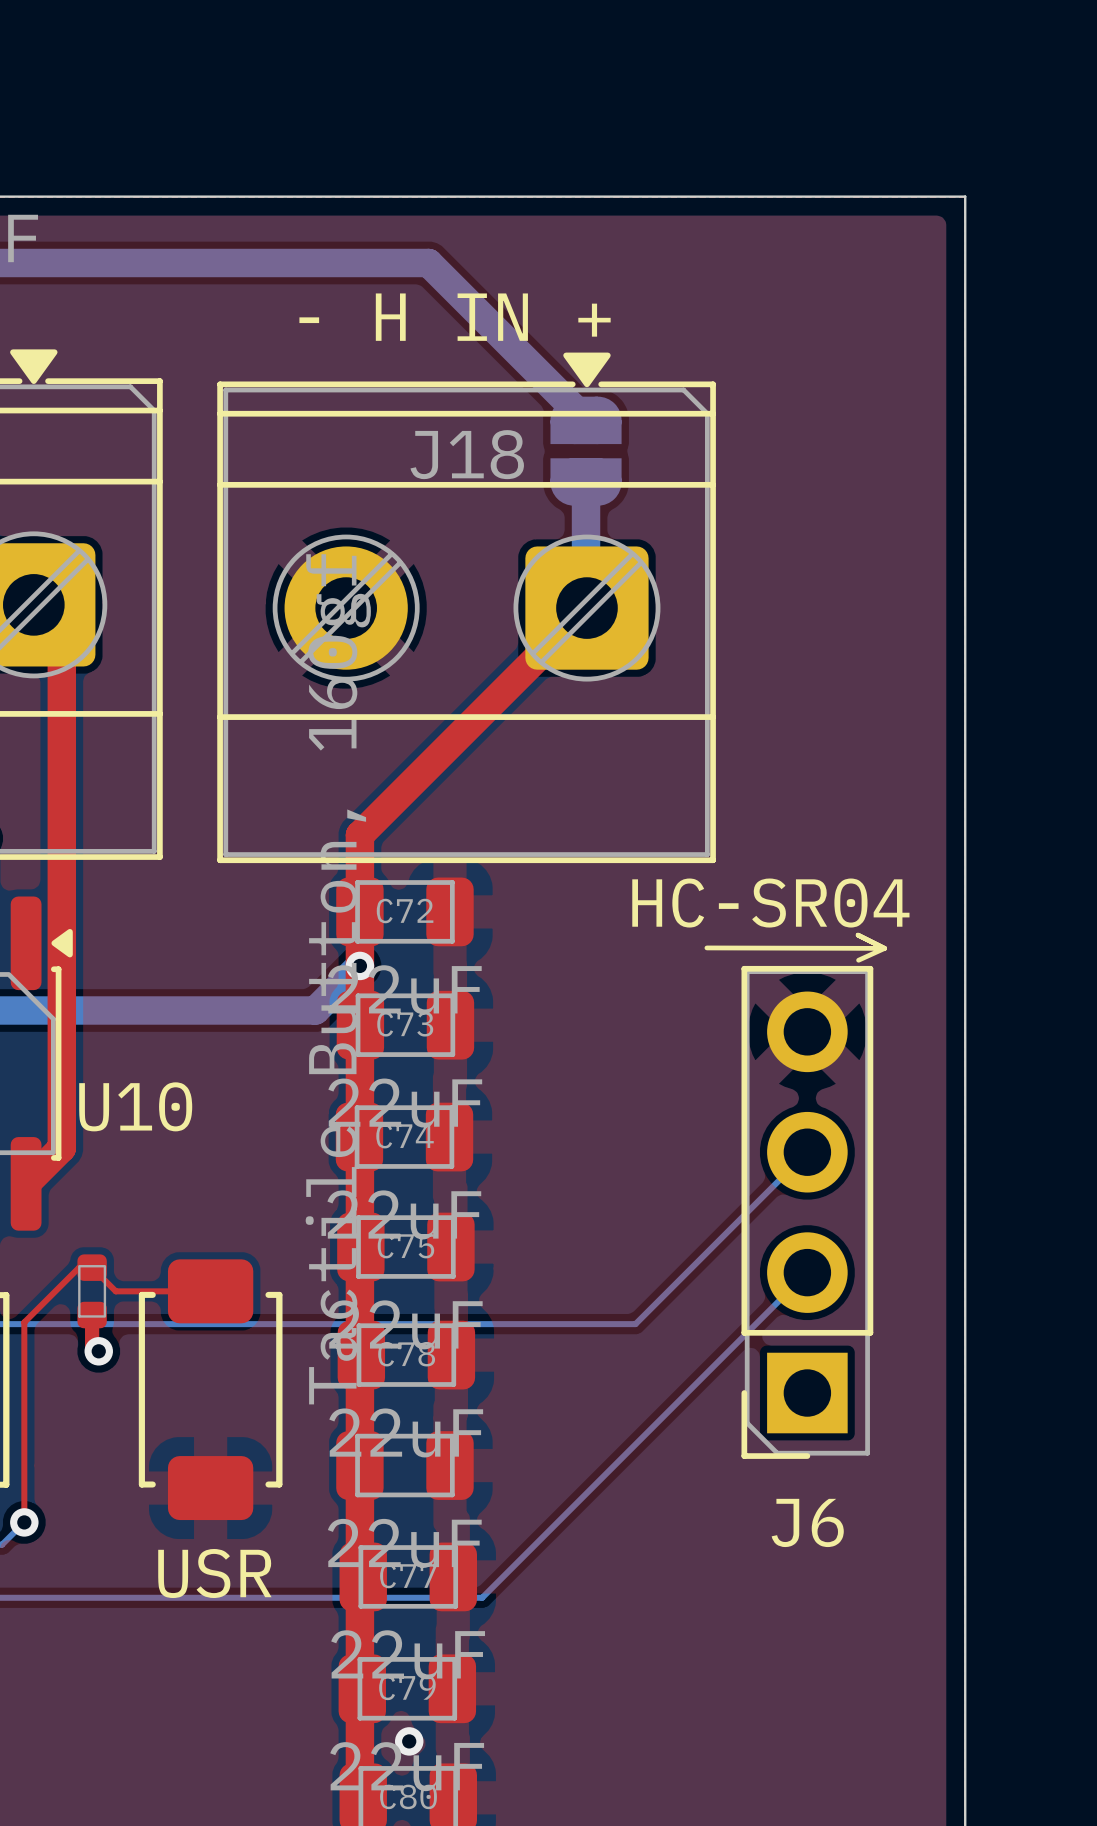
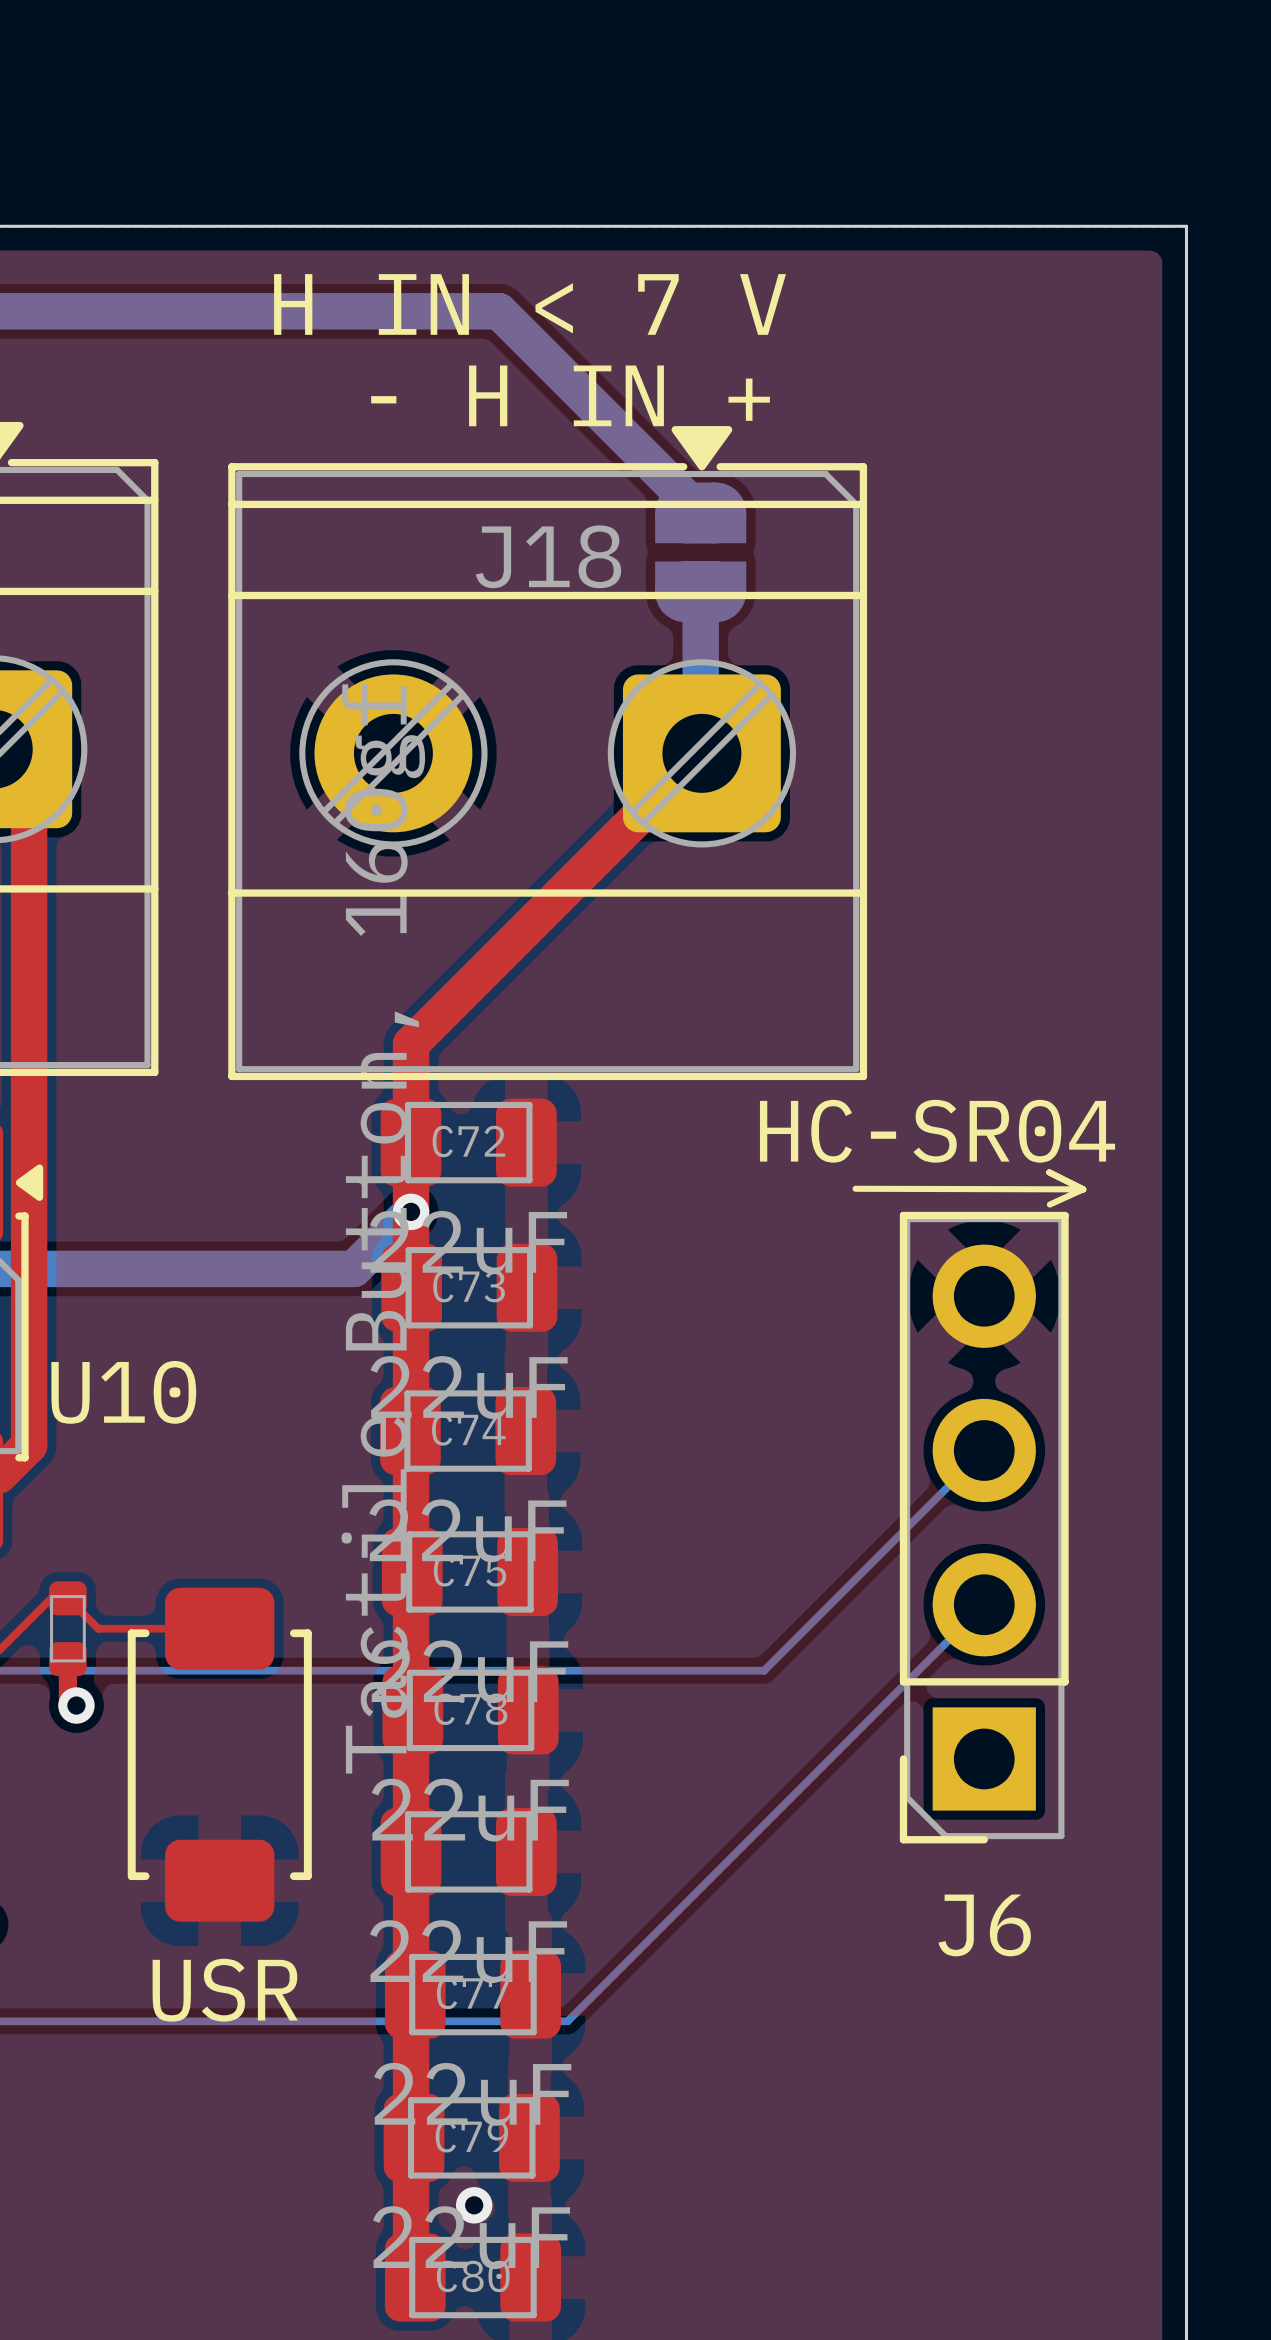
text: none -> H IN < 7 V (530, 304)
J18 value position: - H IN + (455, 317) -> - H IN + (570, 395)

